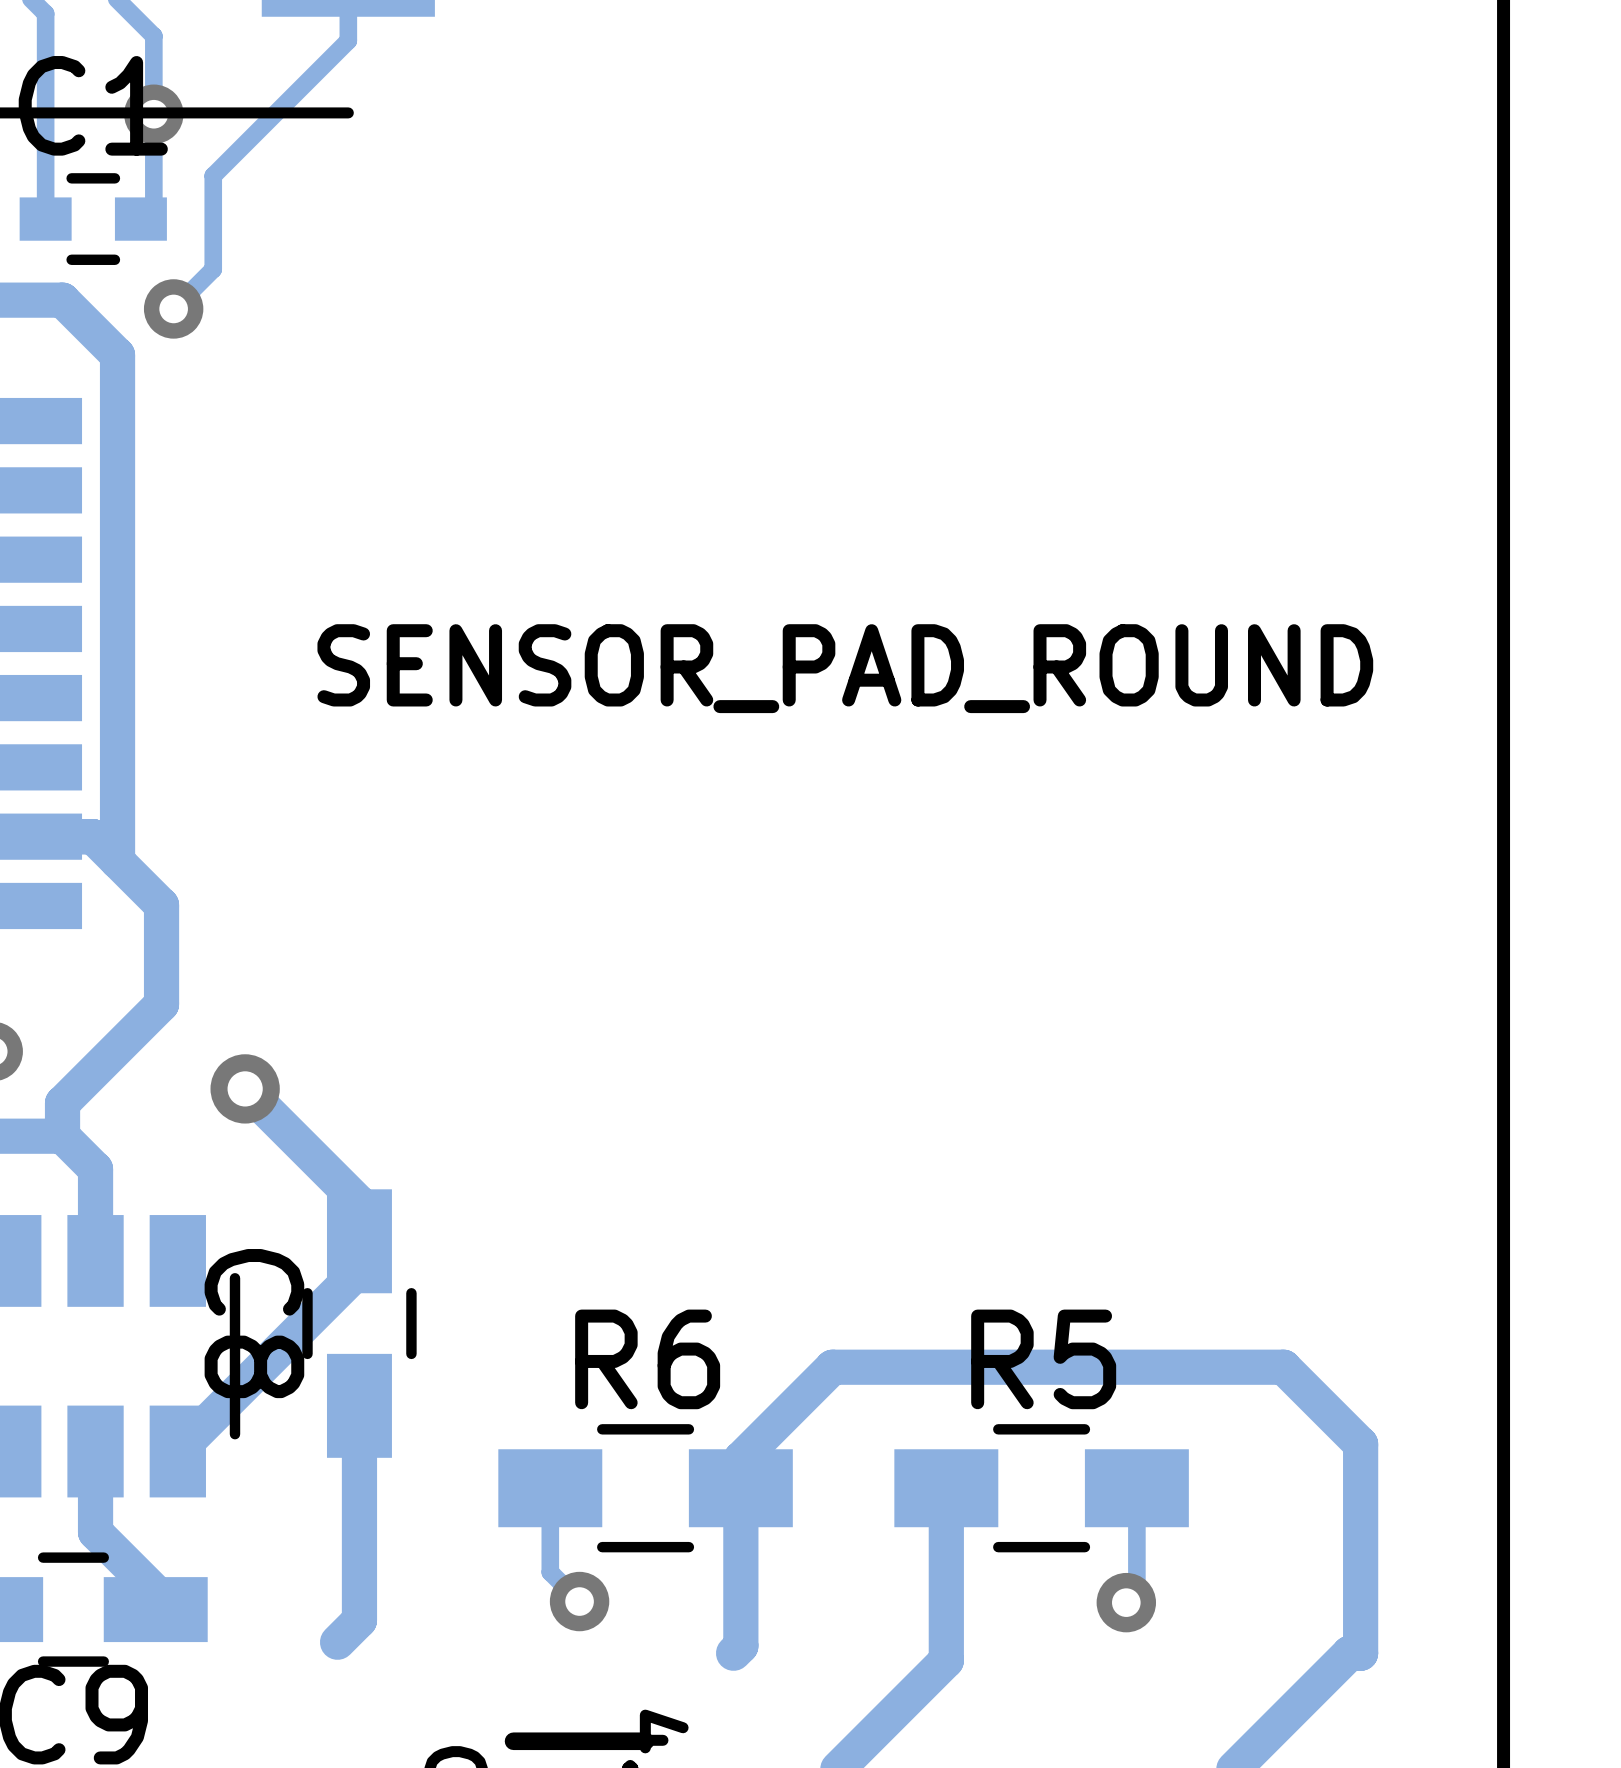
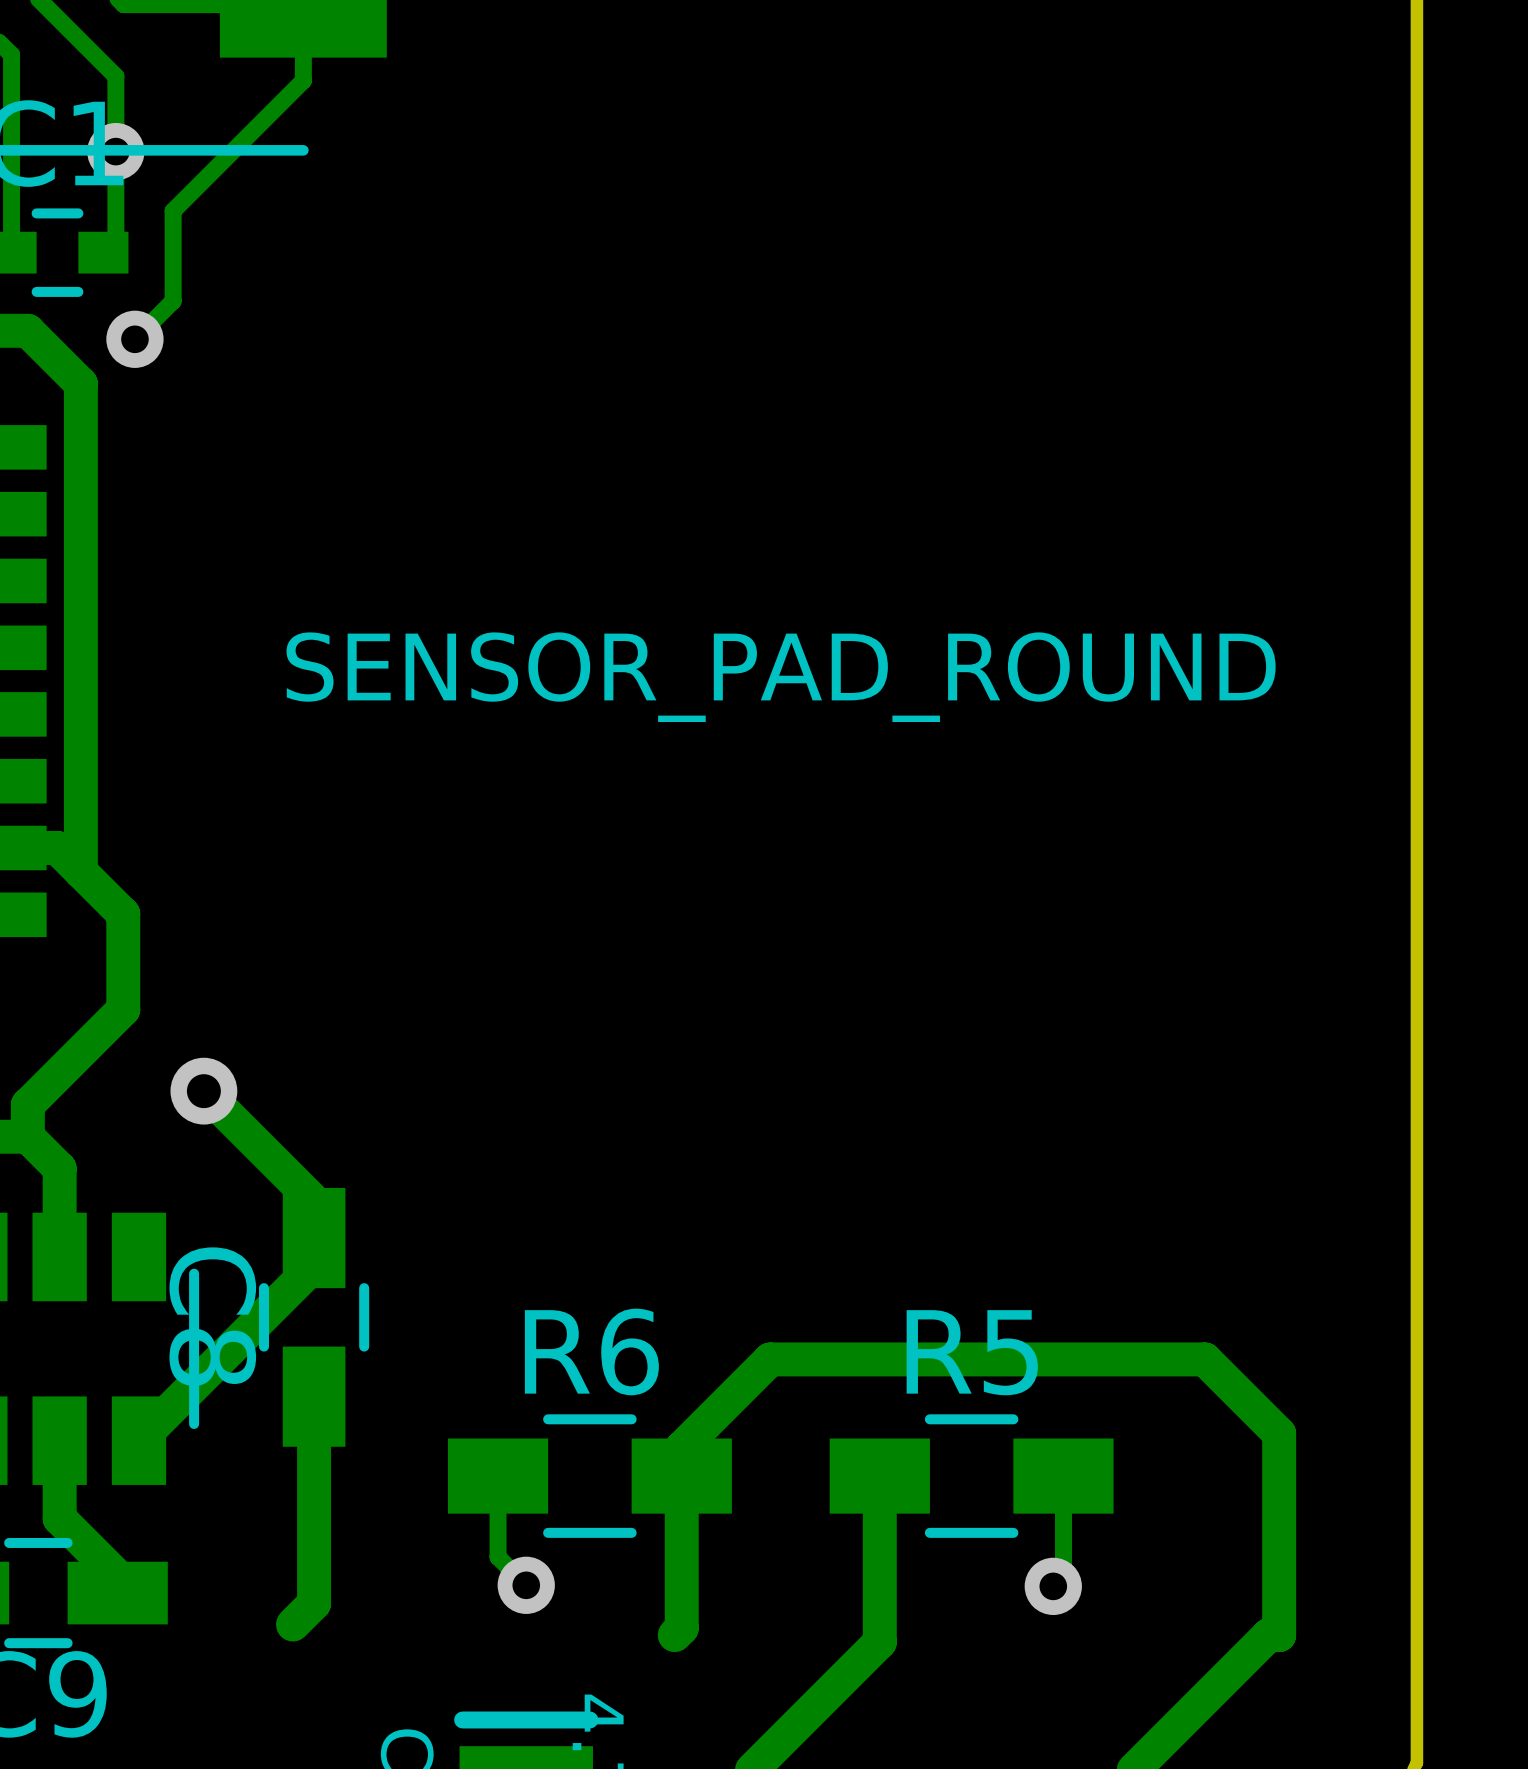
part position: (845, 668) -> (781, 677)

